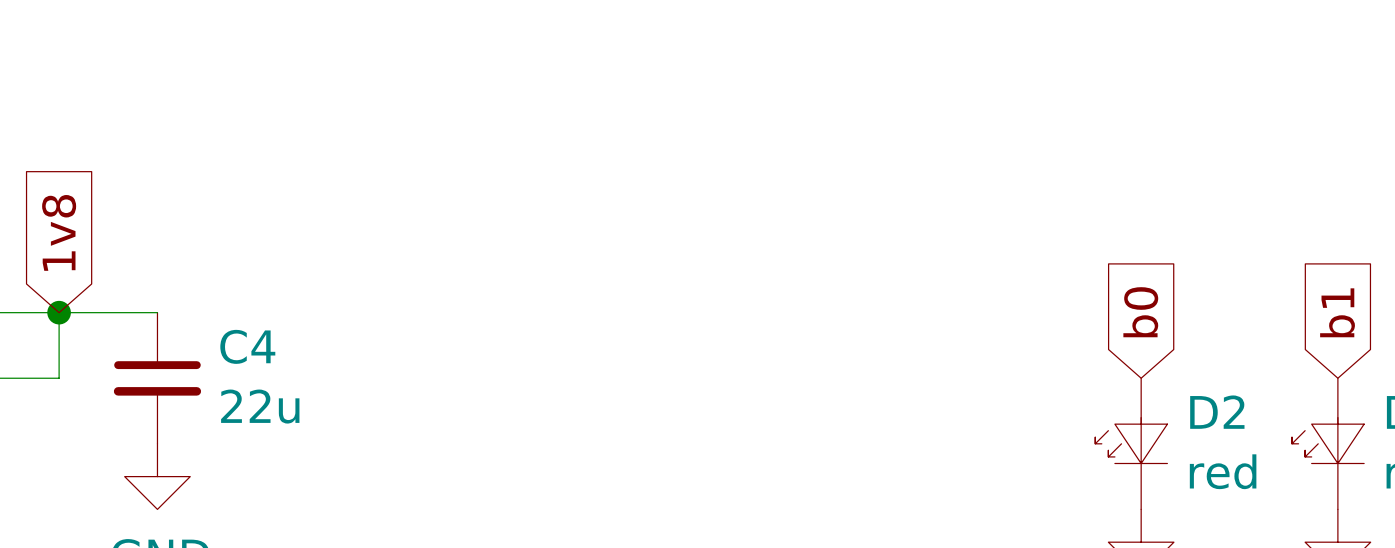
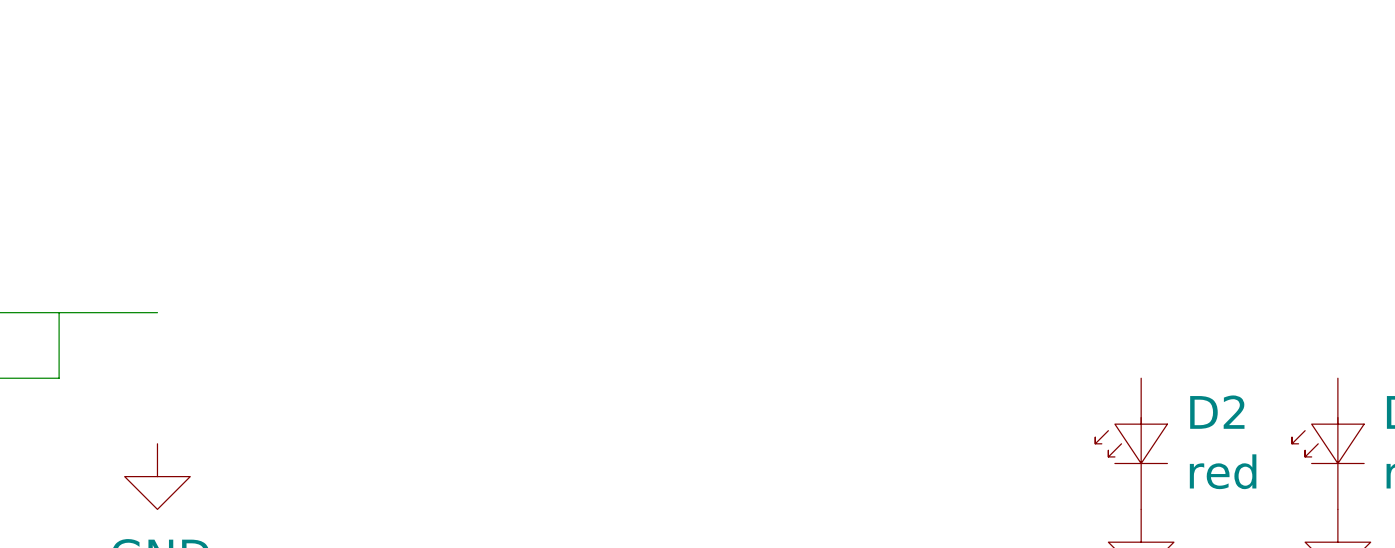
global label: 1v8 (59, 232) -> none
junction: (59, 312) -> none
global label: b0 (1140, 312) -> none
global label: b1 (1337, 312) -> none
C4: 22u (157, 378) -> none

